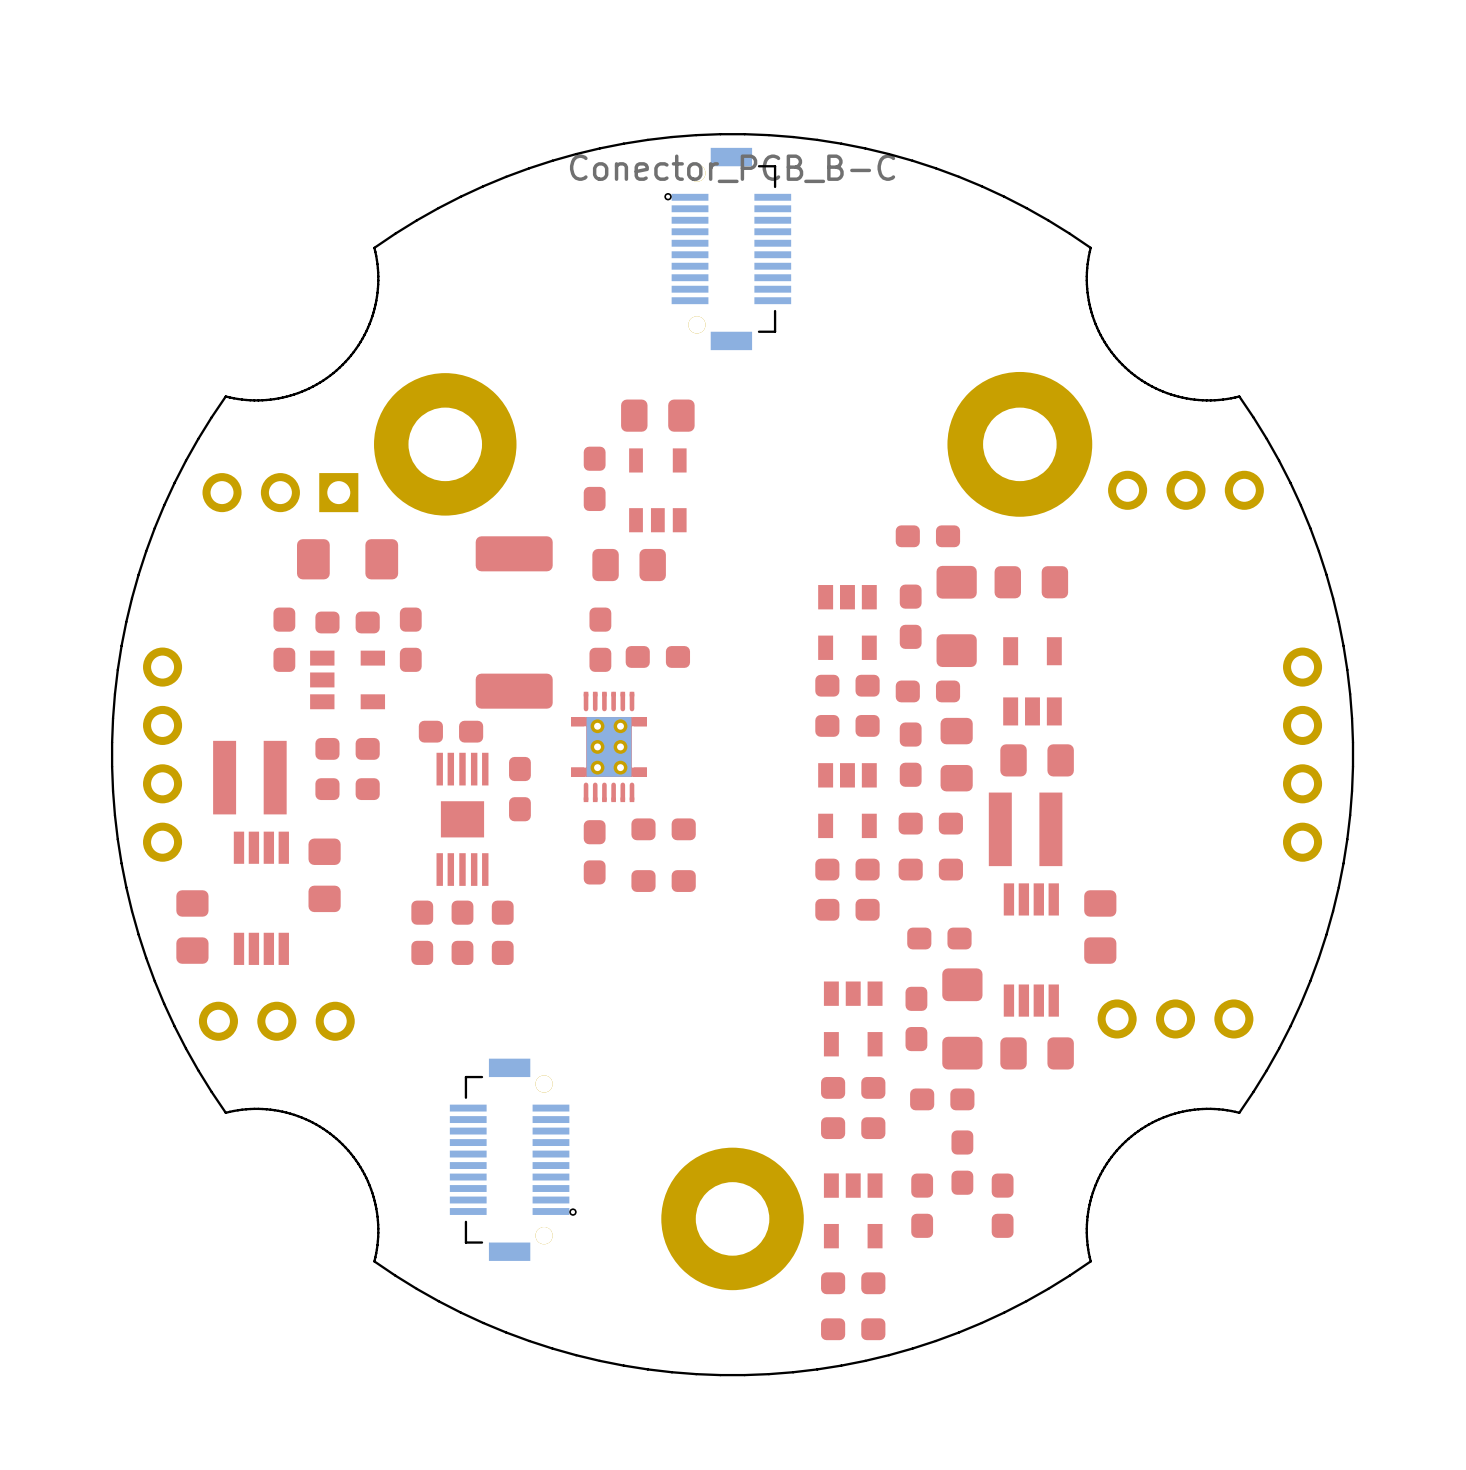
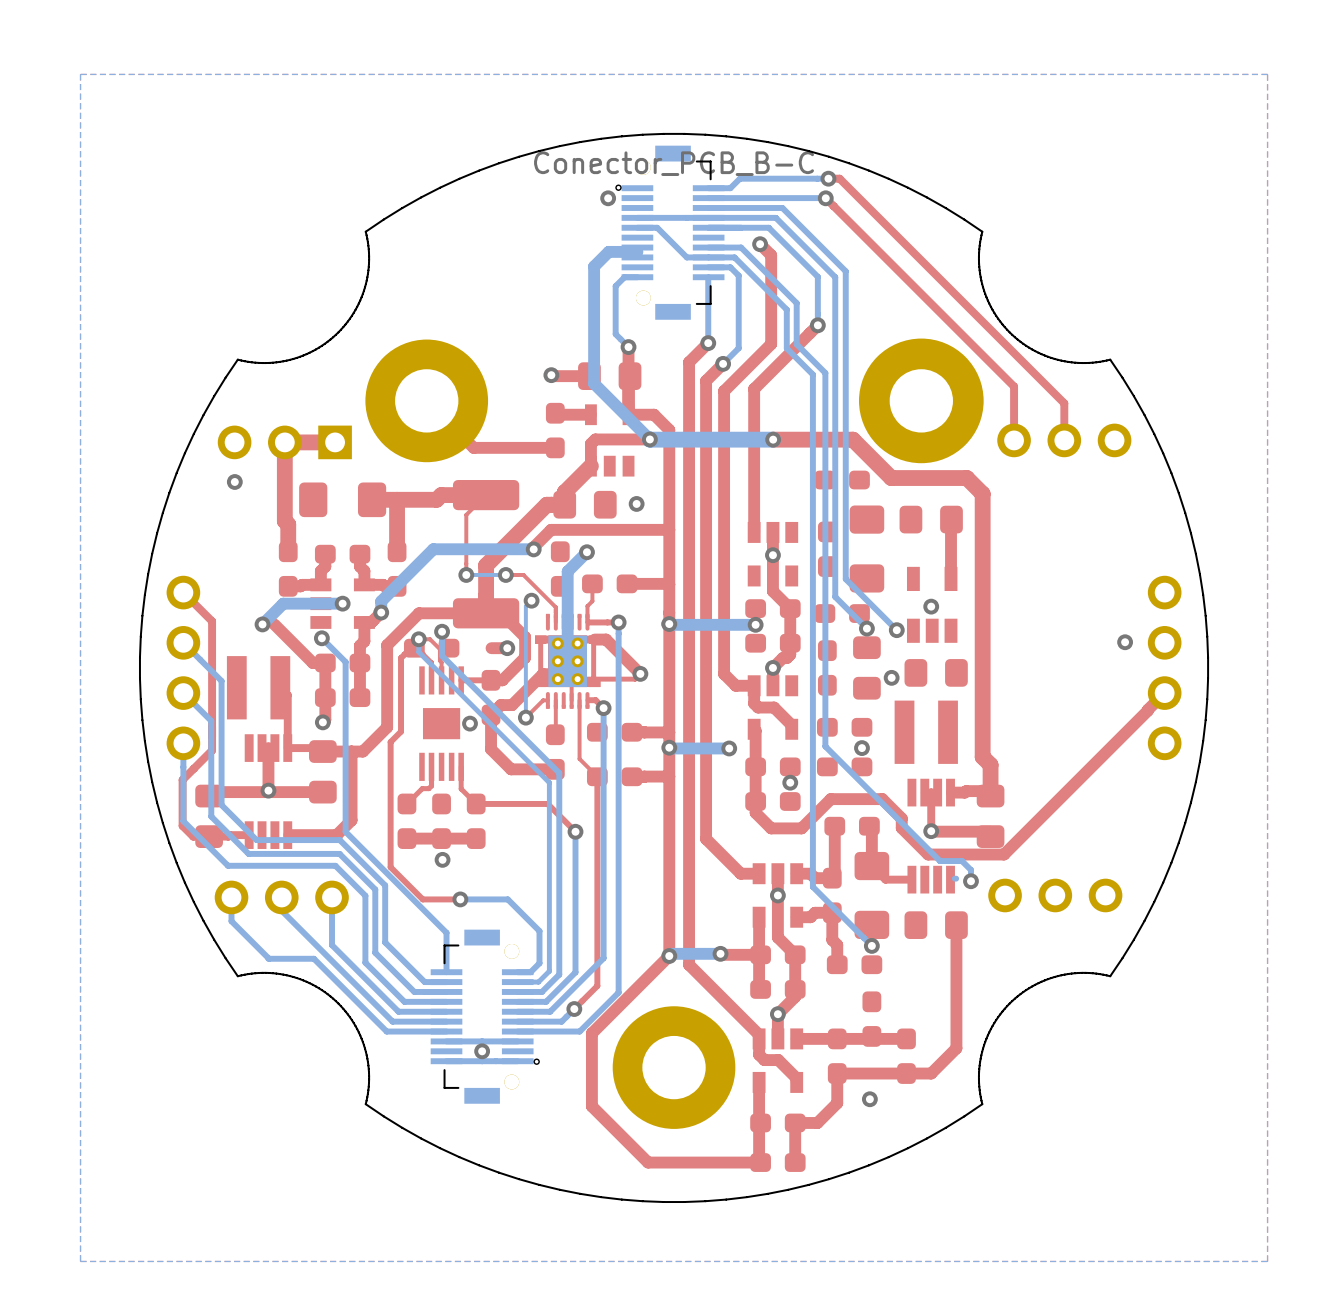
bottom zone outline: none -> (1267, 74) (80, 74) (80, 1261) (1267, 1261) (1267, 74)
bottom track: none -> (828, 178) (739, 178) (730, 188) (708, 188)
top track: none -> (828, 178) (839, 178) (1064, 403) (1064, 440)
via: none -> (828, 178)
bottom track: none -> (825, 198) (708, 198)
via: none -> (608, 198)
top track: none -> (825, 198) (1014, 386) (1014, 440)
via: none -> (825, 198)
bottom track: none -> (708, 207) (782, 207) (845, 271) (845, 579) (896, 630)
bottom track: none -> (637, 217) (775, 217) (835, 277) (835, 596) (866, 628)
bottom track: none -> (637, 227) (657, 227) (686, 257) (734, 257) (786, 309) (786, 348) (812, 374) (812, 886) (871, 945)
bottom track: none -> (708, 227) (768, 227) (817, 276) (817, 325)
top track: none -> (760, 244) (771, 255) (771, 344) (724, 391) (724, 673) (735, 685) (754, 685) (754, 703) (758, 707) (774, 707) (791, 725) (791, 729)
via: none -> (760, 244)
bottom track: none -> (708, 247) (741, 247) (796, 303) (796, 344) (825, 373) (825, 746) (939, 861) (961, 861) (970, 870) (970, 881)
bottom track: none -> (637, 251) (608, 251) (594, 266) (594, 383) (649, 439)
bottom track: none -> (708, 267) (730, 267) (738, 275) (738, 348) (723, 363)
bottom track: none -> (637, 277) (624, 277) (615, 286) (615, 334) (628, 347)
bottom track: none -> (708, 277) (708, 343)
top track: none -> (817, 325) (754, 389) (754, 532)
via: none -> (817, 325)
top track: none -> (708, 343) (689, 362) (689, 964) (759, 1034) (759, 1054) (764, 1060) (778, 1060) (796, 1078) (796, 1082)
via: none -> (708, 343)
top track: none -> (628, 347) (628, 414) (654, 414) (669, 429) (669, 956) (591, 1033) (591, 1106) (648, 1162) (760, 1162) (759, 1082)
via: none -> (628, 347)
top track: none -> (723, 363) (706, 380) (706, 838) (740, 873) (759, 873)
via: none -> (723, 363)
top track: none -> (551, 375) (589, 376)
via: none -> (551, 375)
top track: none -> (426, 400) (473, 447) (555, 447)
top track: none -> (555, 413) (590, 414)
bottom track: none -> (650, 439) (772, 440)
top track: none -> (649, 439) (595, 439) (590, 443) (590, 466) (564, 492) (564, 504) (546, 504) (486, 565) (486, 613)
via: none -> (649, 439)
top track: none -> (773, 439) (852, 439) (891, 478) (966, 478) (982, 493) (982, 756) (990, 764) (990, 791) (951, 792)
via: none -> (773, 439)
top track: none -> (335, 442) (284, 442) (284, 521) (288, 524) (288, 551)
via: none -> (234, 481)
top track: none -> (372, 499) (436, 499) (441, 495) (486, 495) (466, 514) (466, 574)
top track: none -> (397, 499) (397, 551)
via: none -> (636, 503)
top track: none -> (951, 519) (951, 578)
top track: none -> (669, 529) (551, 529) (533, 549)
top track: none -> (772, 532) (772, 591) (790, 608) (790, 654) (786, 658) (782, 658) (772, 667) (772, 685)
bottom track: none -> (533, 549) (433, 549) (381, 601) (381, 612)
via: none -> (533, 549)
bottom track: none -> (586, 552) (567, 571) (567, 661)
via: none -> (586, 552)
top track: none -> (325, 554) (325, 566) (320, 571) (320, 584) (288, 586)
top track: none -> (359, 554) (359, 566) (364, 571) (364, 584) (397, 586)
via: none -> (772, 555)
via: none -> (466, 574)
bottom track: none -> (505, 574) (466, 574)
top track: none -> (505, 574) (523, 574) (555, 607) (555, 622)
via: none -> (505, 574)
top track: none -> (592, 583) (592, 601) (587, 606) (587, 622)
top track: none -> (627, 583) (669, 584)
top track: none -> (183, 592) (212, 621) (212, 750) (182, 779) (182, 825) (193, 836) (249, 835)
bottom track: none -> (531, 600) (525, 606) (525, 717)
via: none -> (531, 600)
bottom track: none -> (342, 603) (283, 603) (262, 624)
via: none -> (342, 603)
via: none -> (931, 606)
top track: none -> (381, 612) (371, 622) (364, 622) (364, 641) (359, 645) (359, 697)
via: none -> (381, 612)
top track: none -> (486, 613) (419, 613) (387, 645) (387, 727) (362, 751) (322, 751) (319, 748) (287, 748) (287, 695) (280, 687)
top track: none -> (486, 613) (500, 612) (525, 637) (525, 657) (502, 680) (461, 680)
bottom track: none -> (618, 622) (618, 992) (579, 1031) (517, 1031)
top track: none -> (618, 622) (588, 622)
via: none -> (618, 622)
bottom track: none -> (669, 624) (755, 624)
via: none -> (669, 624)
via: none -> (262, 624)
top track: none -> (274, 624) (312, 663) (325, 663) (325, 719) (322, 722)
via: none -> (755, 624)
via: none -> (866, 628)
via: none -> (896, 630)
bottom track: none -> (442, 631) (442, 655) (559, 773) (559, 974) (541, 991) (517, 991)
via: none -> (442, 631)
bottom track: none -> (321, 638) (345, 662) (345, 831) (446, 932) (446, 972)
via: none -> (321, 638)
bottom track: none -> (418, 639) (418, 652) (549, 782) (549, 971) (538, 982) (517, 982)
top track: none -> (418, 639) (430, 639) (439, 649) (441, 680)
via: none -> (418, 639)
top track: none -> (540, 639) (540, 683)
top track: none -> (593, 639) (594, 683)
top track: none -> (594, 639) (606, 639) (640, 673) (635, 679) (577, 679) (571, 685) (571, 700)
via: none -> (1125, 642)
bottom track: none -> (183, 642) (221, 681) (221, 805) (256, 840) (339, 840) (385, 885) (385, 942) (424, 982) (446, 982)
top track: none -> (507, 648) (491, 648)
via: none -> (507, 648)
via: none -> (772, 667)
top track: none -> (558, 674) (542, 674) (512, 705) (500, 705) (491, 714) (491, 749) (511, 769) (555, 769)
via: none -> (640, 673)
via: none -> (891, 677)
top track: none -> (431, 680) (431, 662) (422, 654) (404, 654) (401, 658) (401, 731) (390, 742) (390, 867) (422, 899) (460, 899)
bottom track: none -> (183, 693) (211, 720) (211, 816) (248, 853) (339, 853) (375, 889) (375, 952) (414, 991) (446, 991)
top track: none -> (1164, 693) (1004, 854) (928, 854) (901, 828) (901, 818) (882, 799) (830, 799) (801, 828) (771, 828) (755, 812) (754, 729)
top track: none -> (547, 700) (543, 700) (525, 717)
top track: none -> (555, 700) (555, 734)
top track: none -> (579, 700) (579, 758) (597, 776) (597, 985) (574, 1009)
top track: none -> (588, 700) (595, 700) (603, 708)
bottom track: none -> (603, 708) (603, 958) (550, 1011) (517, 1011)
via: none -> (603, 708)
via: none -> (525, 717)
via: none -> (322, 722)
via: none -> (470, 723)
top track: none -> (669, 732) (644, 732)
bottom track: none -> (183, 743) (183, 821) (228, 865) (335, 865) (365, 895) (365, 962) (404, 1001) (446, 1001)
top track: none -> (268, 748) (268, 790)
bottom track: none -> (669, 747) (729, 748)
via: none -> (669, 747)
via: none -> (861, 748)
via: none -> (729, 748)
top track: none -> (351, 751) (351, 820) (336, 835) (289, 835)
top track: none -> (431, 766) (431, 785) (428, 788) (422, 788) (406, 803)
top track: none -> (461, 766) (461, 788) (476, 803) (547, 803) (575, 831)
top track: none -> (669, 776) (644, 776)
via: none -> (790, 782)
via: none -> (268, 790)
top track: none -> (322, 792) (213, 792) (209, 796)
top track: none -> (931, 792) (931, 831) (990, 831)
top track: none -> (834, 826) (834, 875) (832, 878) (814, 878) (810, 873) (796, 873)
top track: none -> (869, 826) (871, 828) (871, 866) (885, 879) (911, 879)
bottom track: none -> (575, 831) (575, 972) (546, 1001) (517, 1001)
via: none -> (575, 831)
via: none -> (931, 831)
top track: none -> (476, 838) (406, 838)
via: none -> (442, 859)
top track: none -> (777, 873) (777, 937) (795, 954) (795, 996) (777, 1014) (777, 1038)
bottom track: none -> (956, 878) (954, 878)
via: none -> (970, 881)
via: none -> (777, 895)
bottom track: none -> (231, 897) (231, 921) (269, 958)
bottom track: none -> (281, 897) (281, 910) (392, 1021) (446, 1021)
bottom track: none -> (332, 897) (332, 945) (398, 1011) (446, 1011)
bottom track: none -> (460, 899) (507, 899) (539, 931) (539, 963) (530, 972) (517, 972)
via: none -> (460, 899)
top track: none -> (759, 917) (760, 989)
top track: none -> (796, 917) (810, 917) (814, 912) (832, 912) (832, 939) (837, 944) (837, 964)
top track: none -> (956, 925) (956, 1048) (931, 1073) (837, 1073) (837, 1103) (817, 1122) (795, 1122) (795, 1162)
via: none -> (871, 945)
bottom track: none -> (720, 953) (671, 953) (669, 956)
top track: none -> (720, 953) (760, 954)
via: none -> (720, 953)
via: none -> (669, 956)
bottom track: none -> (268, 958) (313, 958) (386, 1031) (446, 1031)
bottom track: none -> (574, 1009) (561, 1021) (517, 1021)
via: none -> (574, 1009)
via: none -> (777, 1014)
top track: none -> (906, 1038) (796, 1038)
bottom track: none -> (517, 1041) (446, 1041)
via: none -> (482, 1051)
bottom track: none -> (517, 1061) (446, 1061)
via: none -> (869, 1099)

